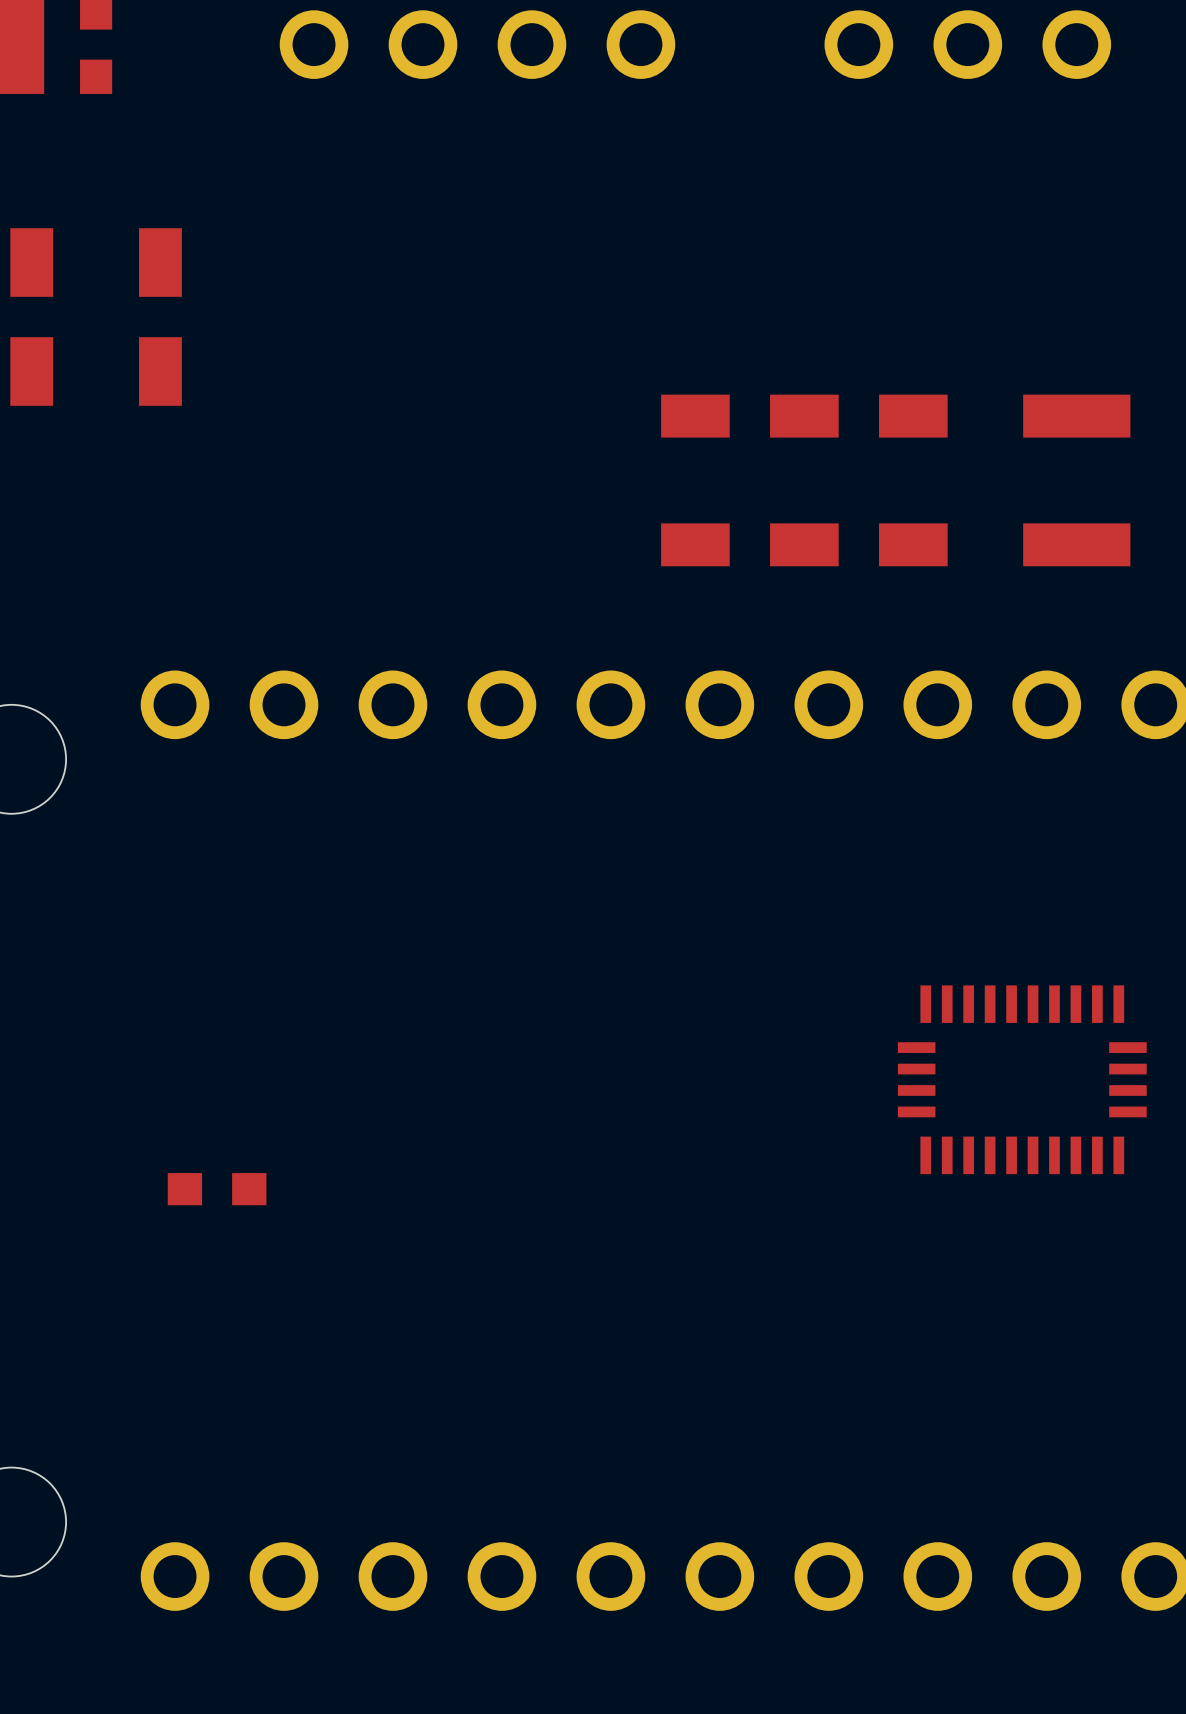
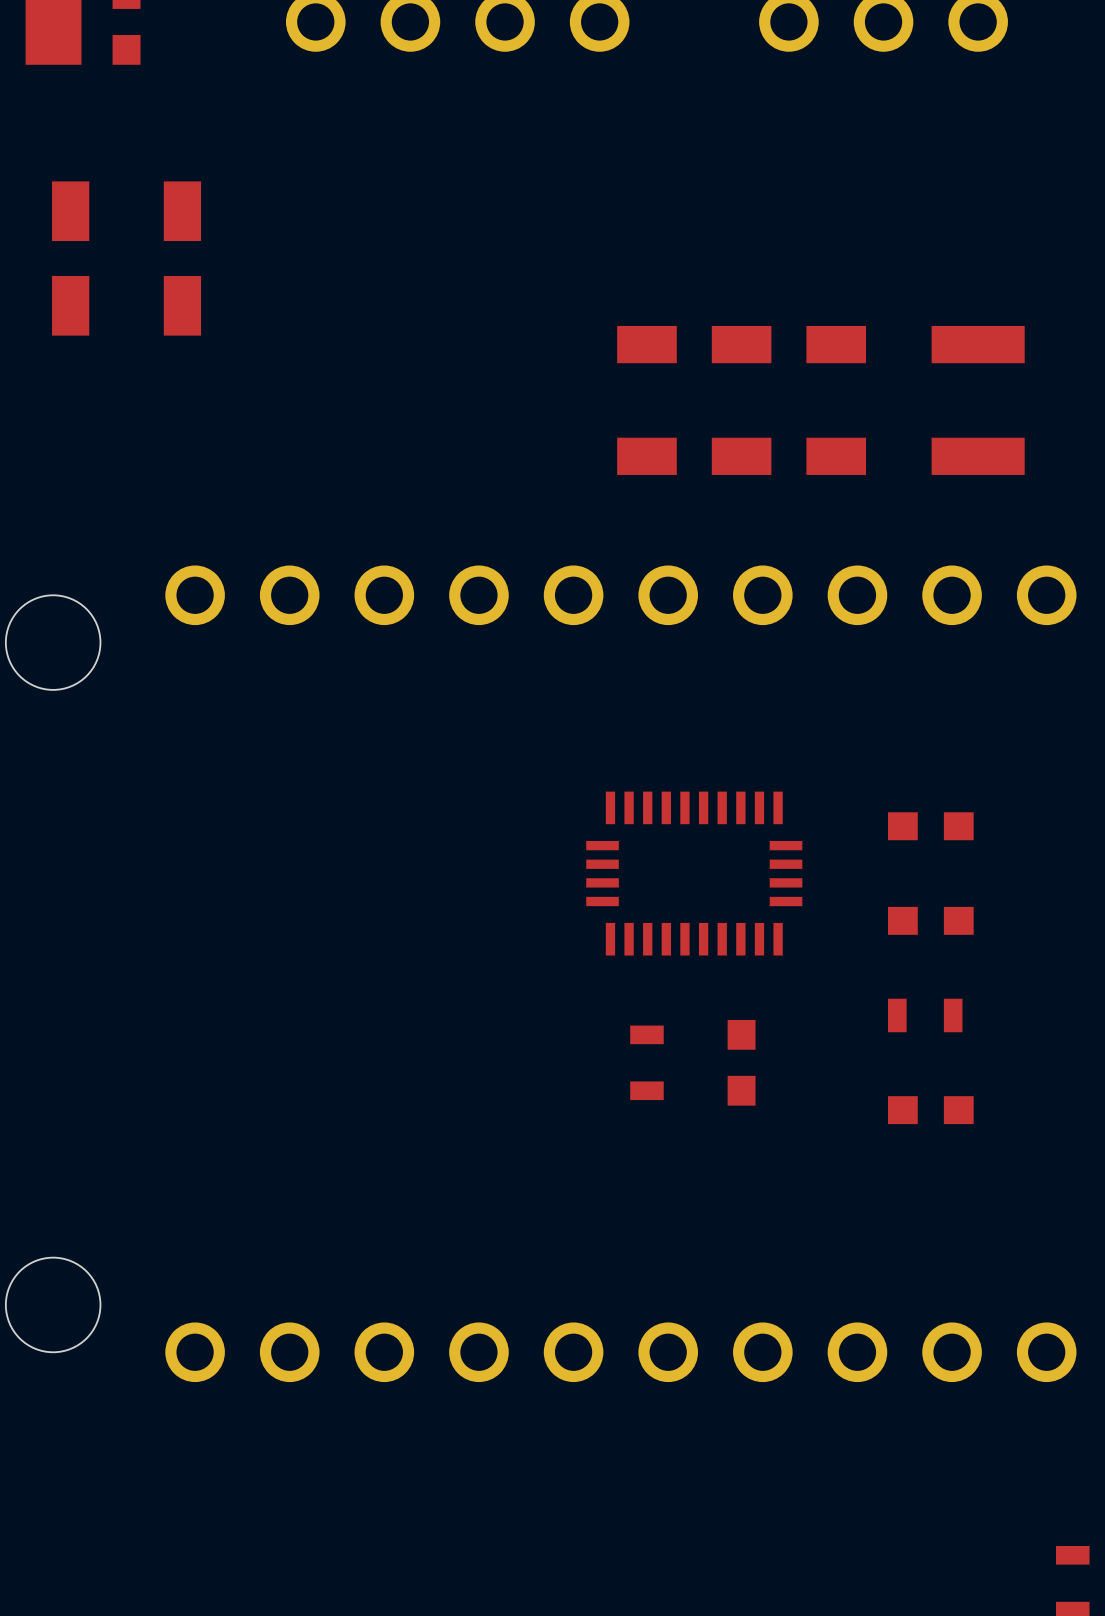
part: none -> (930, 826)
part footprint: [897, 985, 1147, 1175] -> [888, 906, 974, 935]
part: none -> (694, 873)
part: none -> (925, 1015)
part: (217, 1189) -> none
part: none -> (646, 1062)
part: none -> (741, 1062)
part: none -> (930, 1110)

